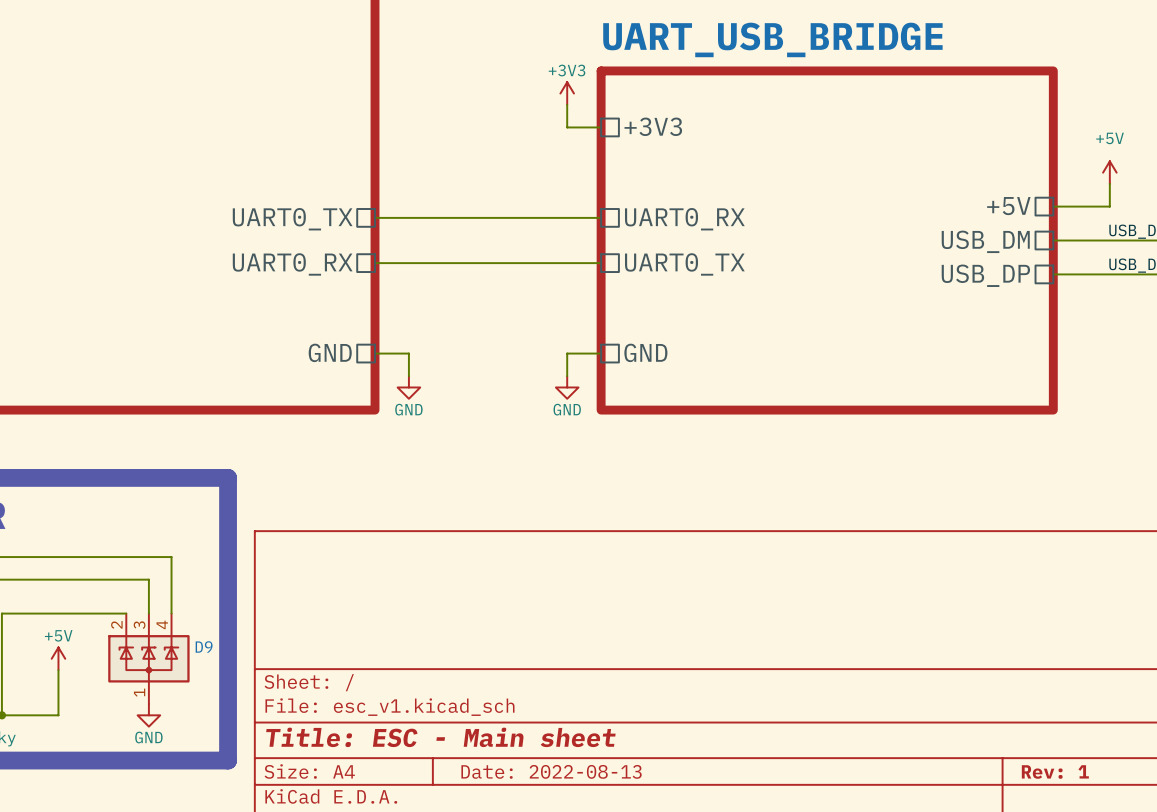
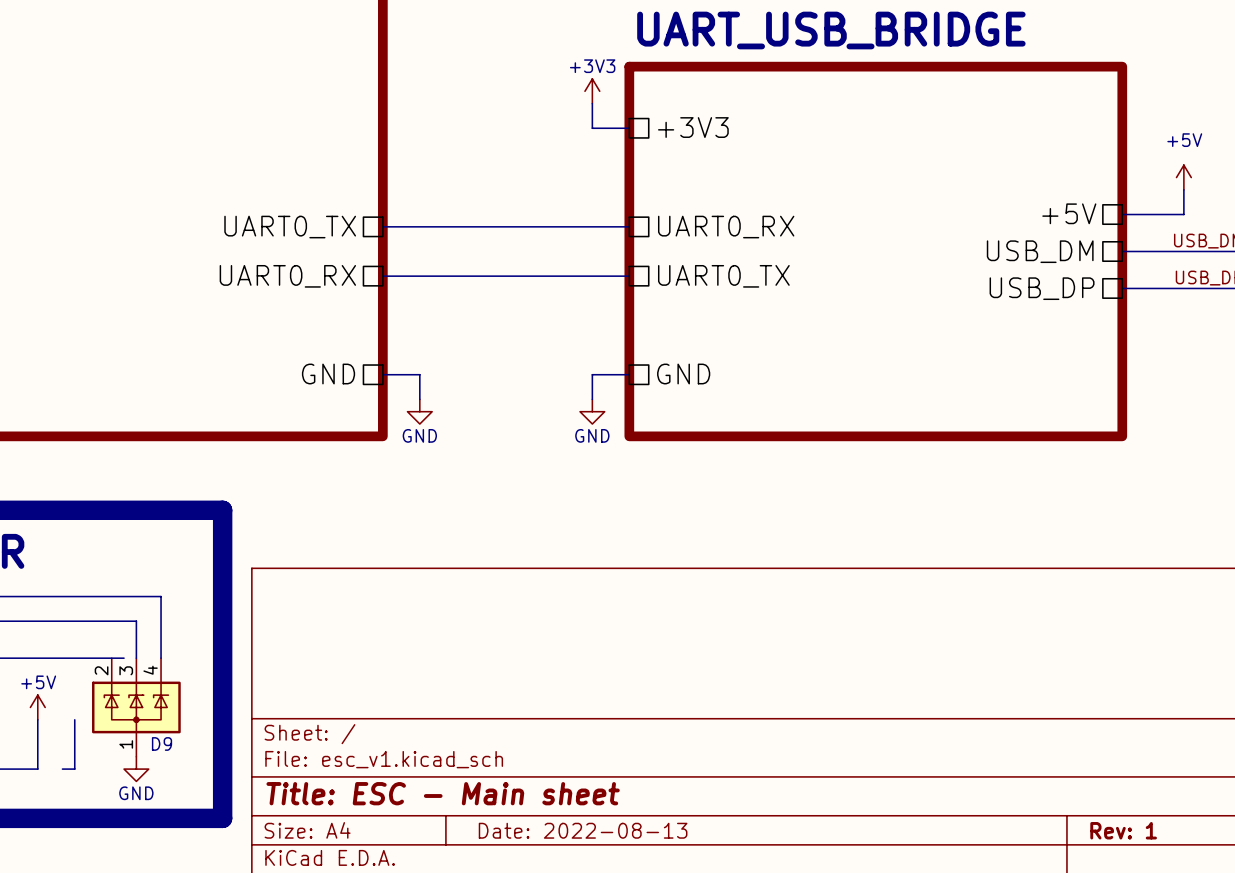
wire: none -> (111, 658) (124, 658)
D9 name position: D9 (204, 646) -> D9 (162, 743)
wire: none -> (74, 719) (74, 769) (62, 769)

